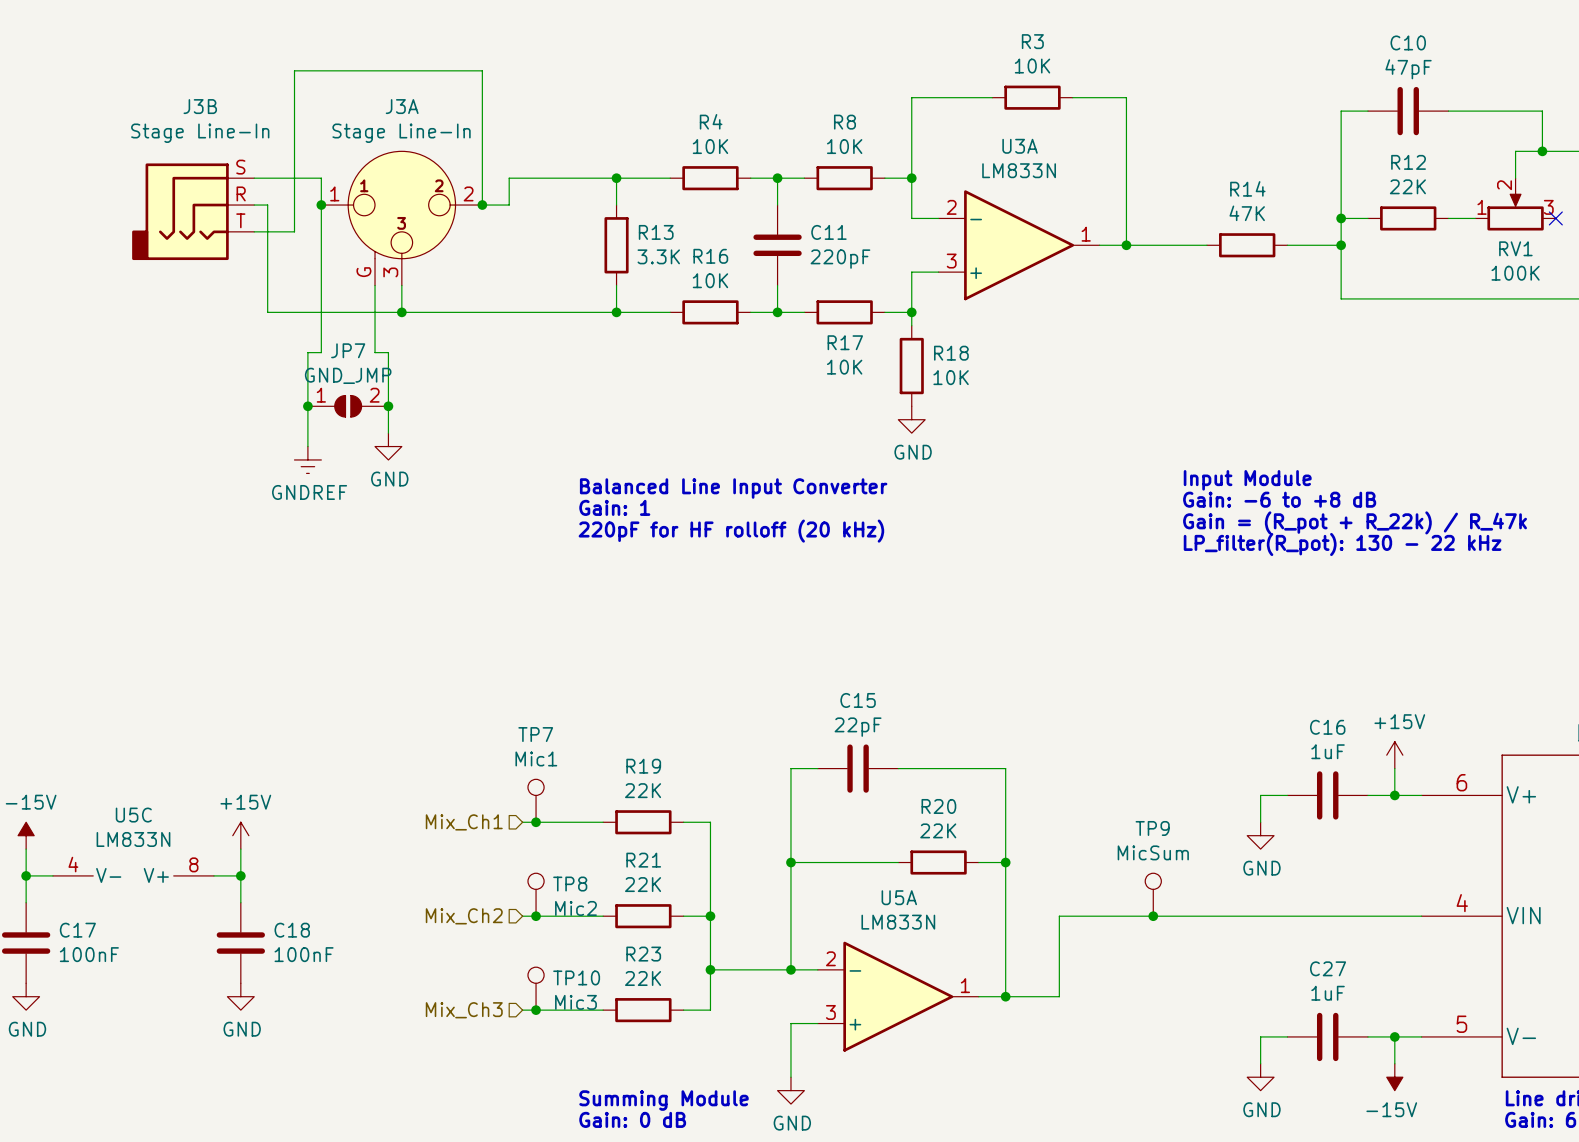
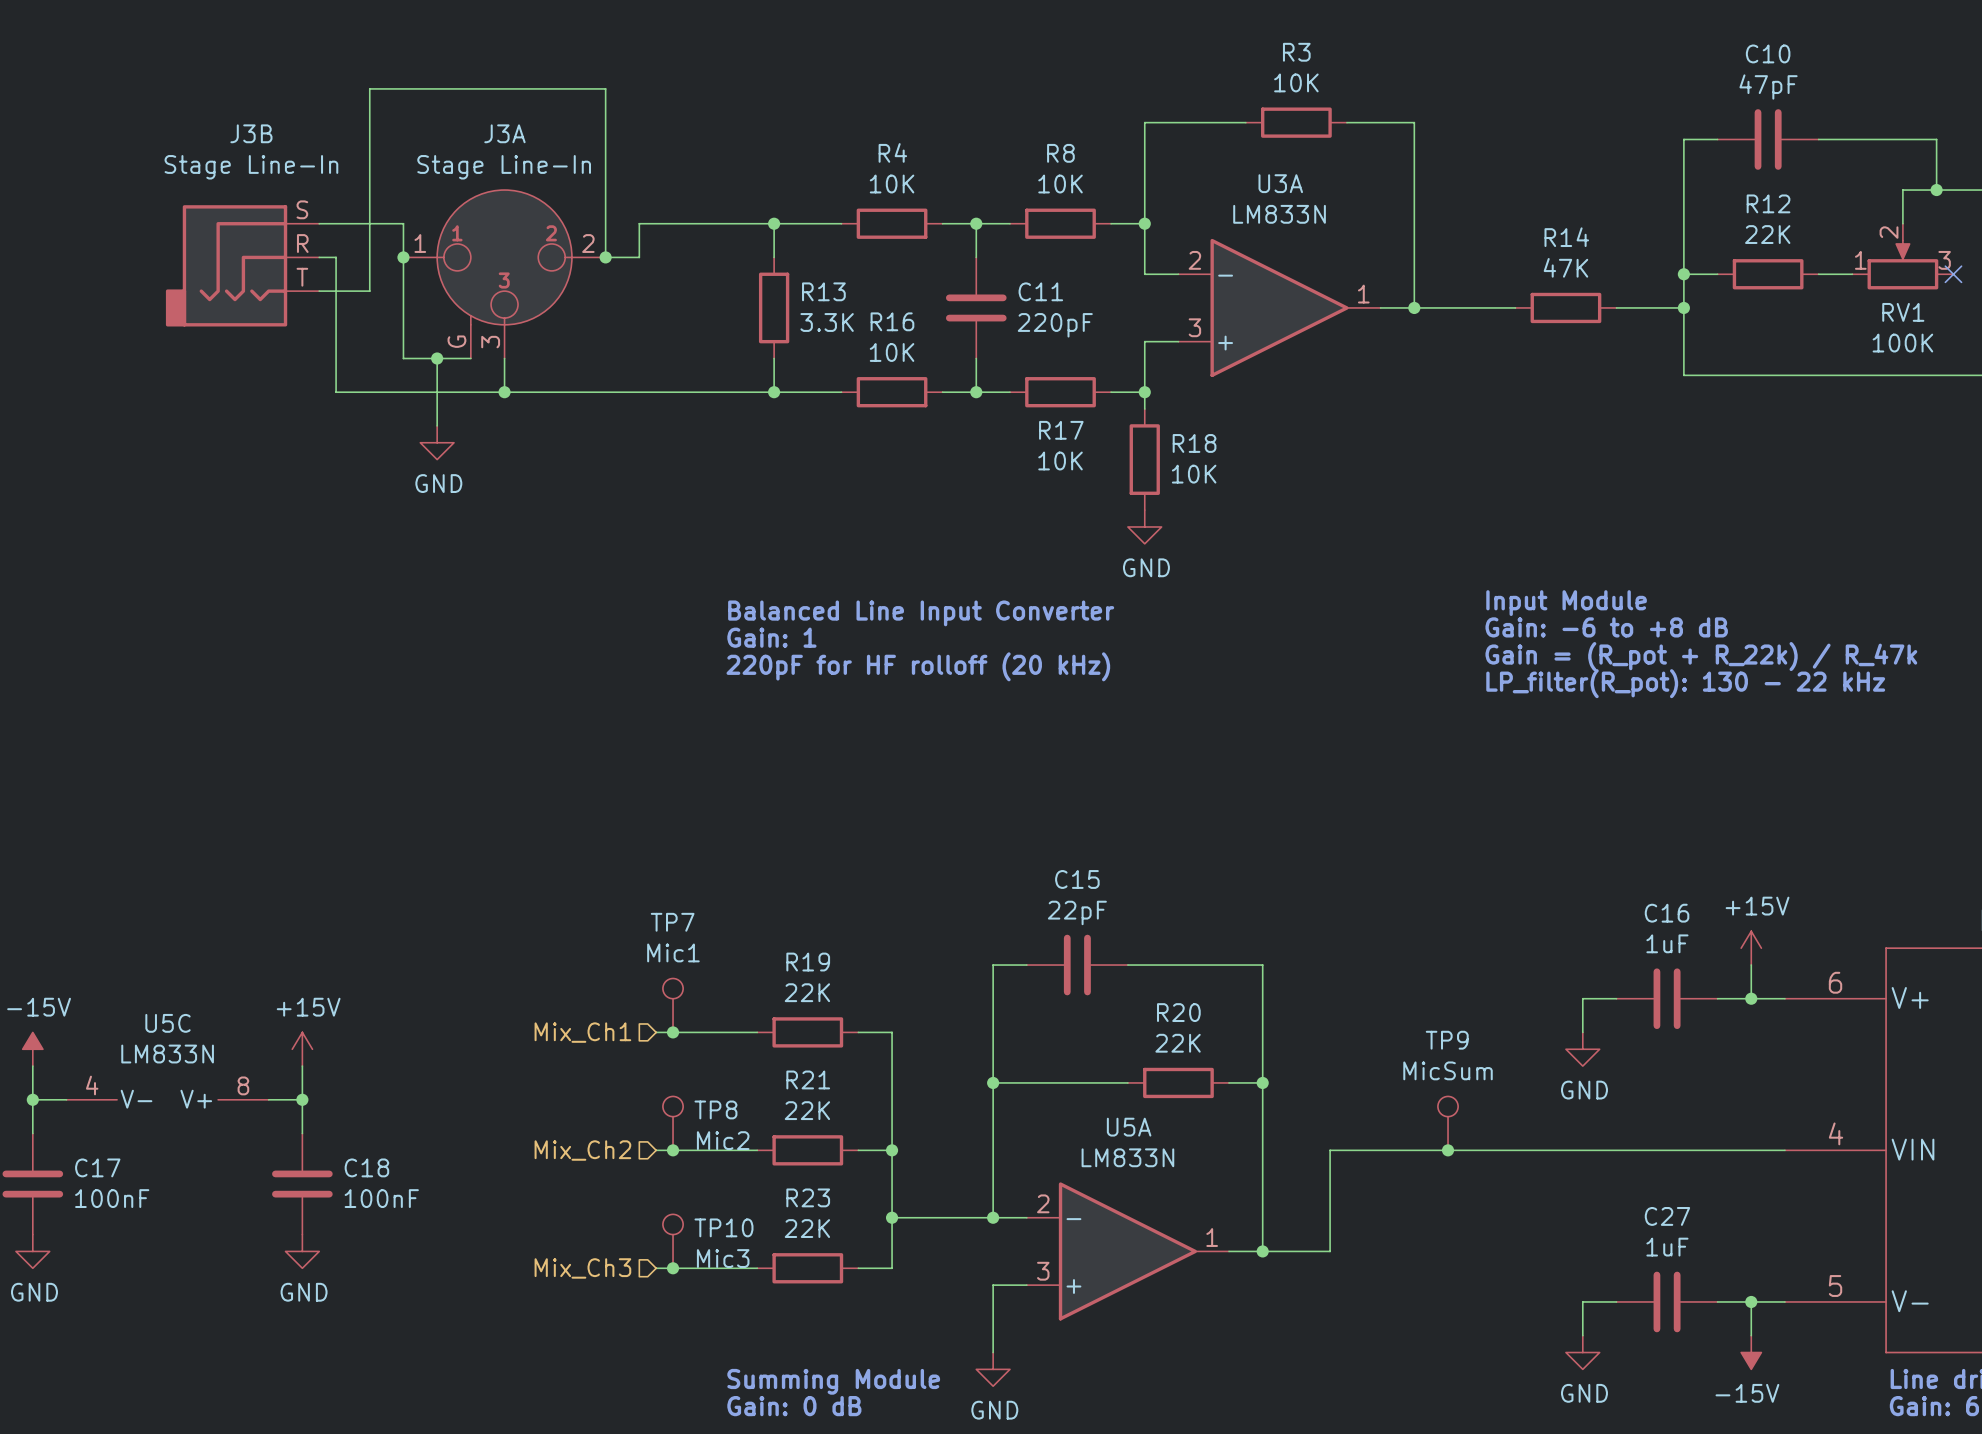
wire: (321, 285) (321, 352) (307, 352) (307, 446) -> none
wire: none -> (437, 358) (437, 425)
junction: none -> (437, 358)
wire: (375, 285) (375, 352) (388, 352) (388, 433) -> (470, 358) (403, 358)
junction: (307, 406) -> none
JP7: GND_JMP (348, 406) -> none
junction: (388, 406) -> none
power symbol position: GND (388, 446) -> GND (437, 442)
power symbol: GNDREF (307, 459) -> none

